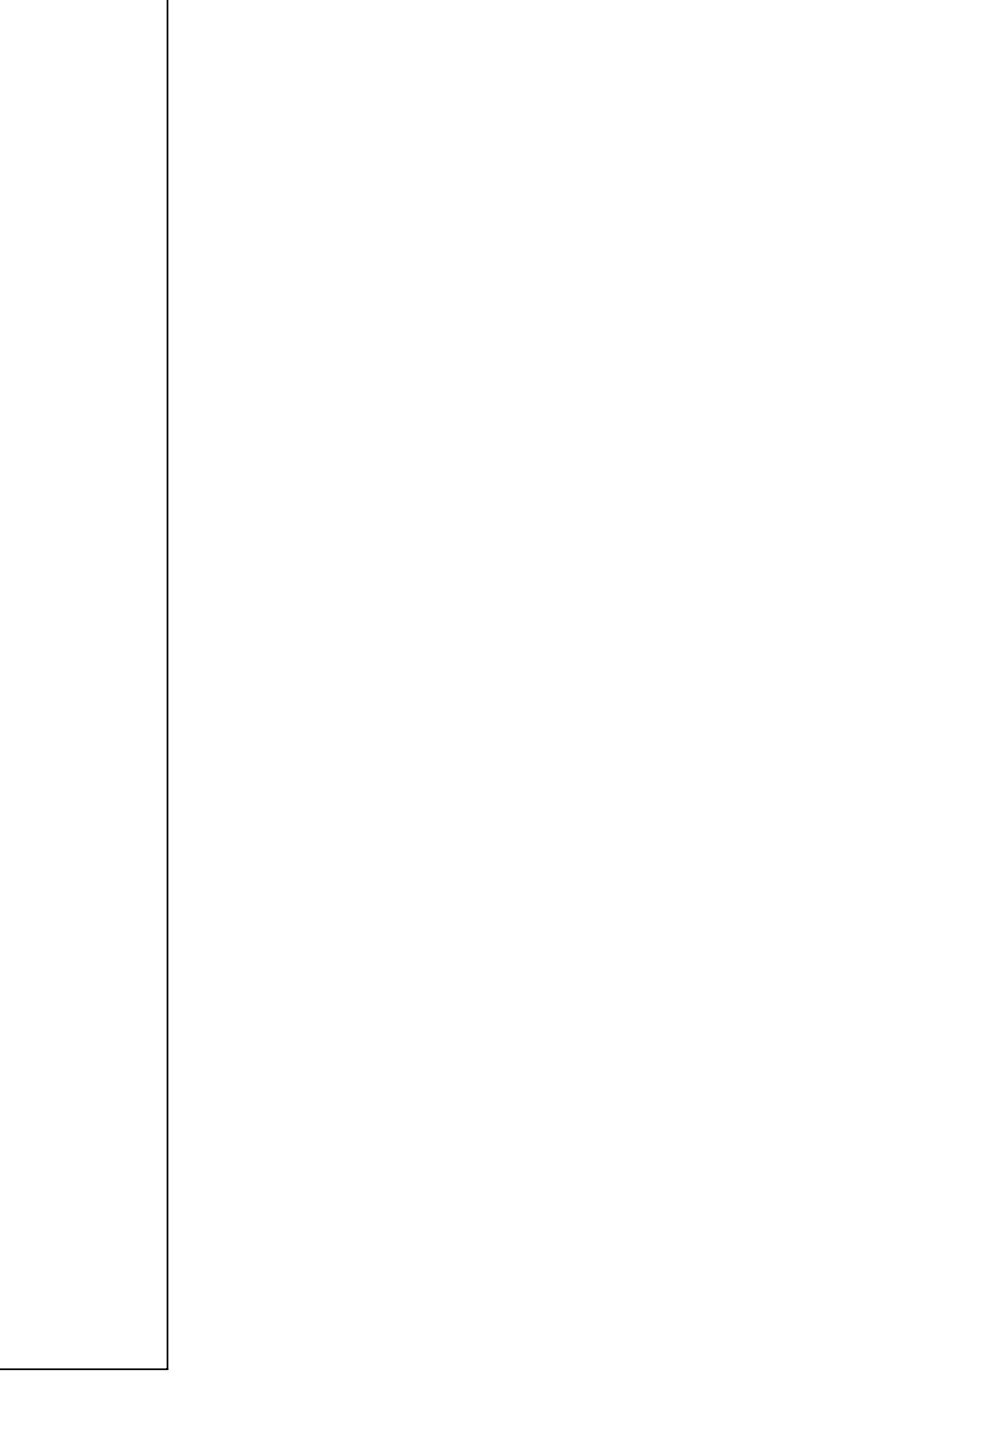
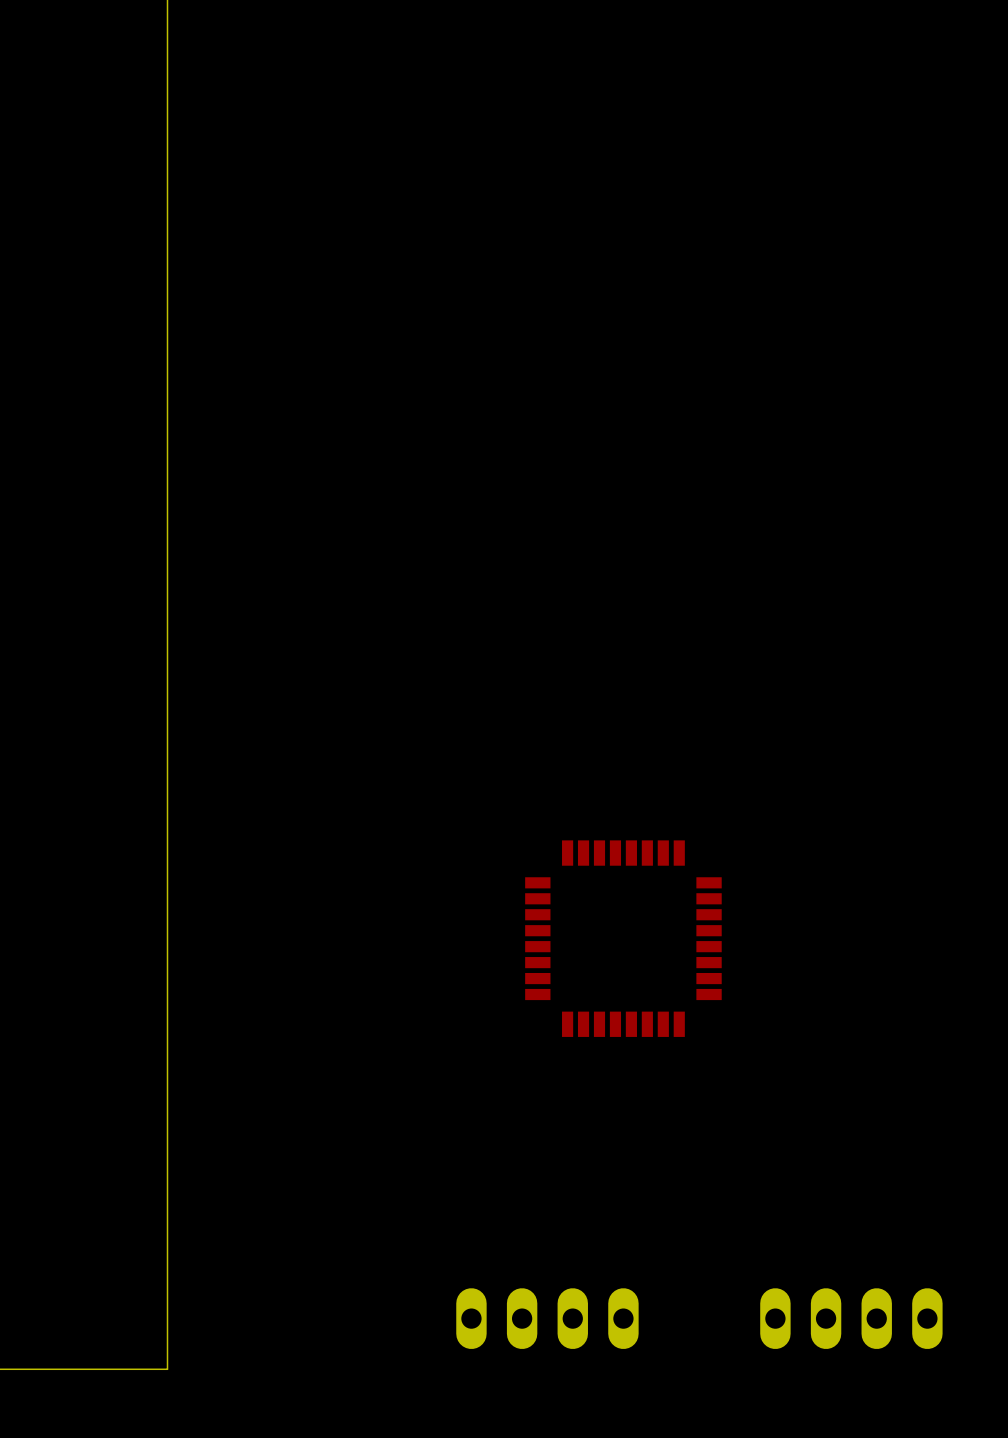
part: none -> (623, 938)
part: none -> (547, 1318)
part: none -> (851, 1318)

